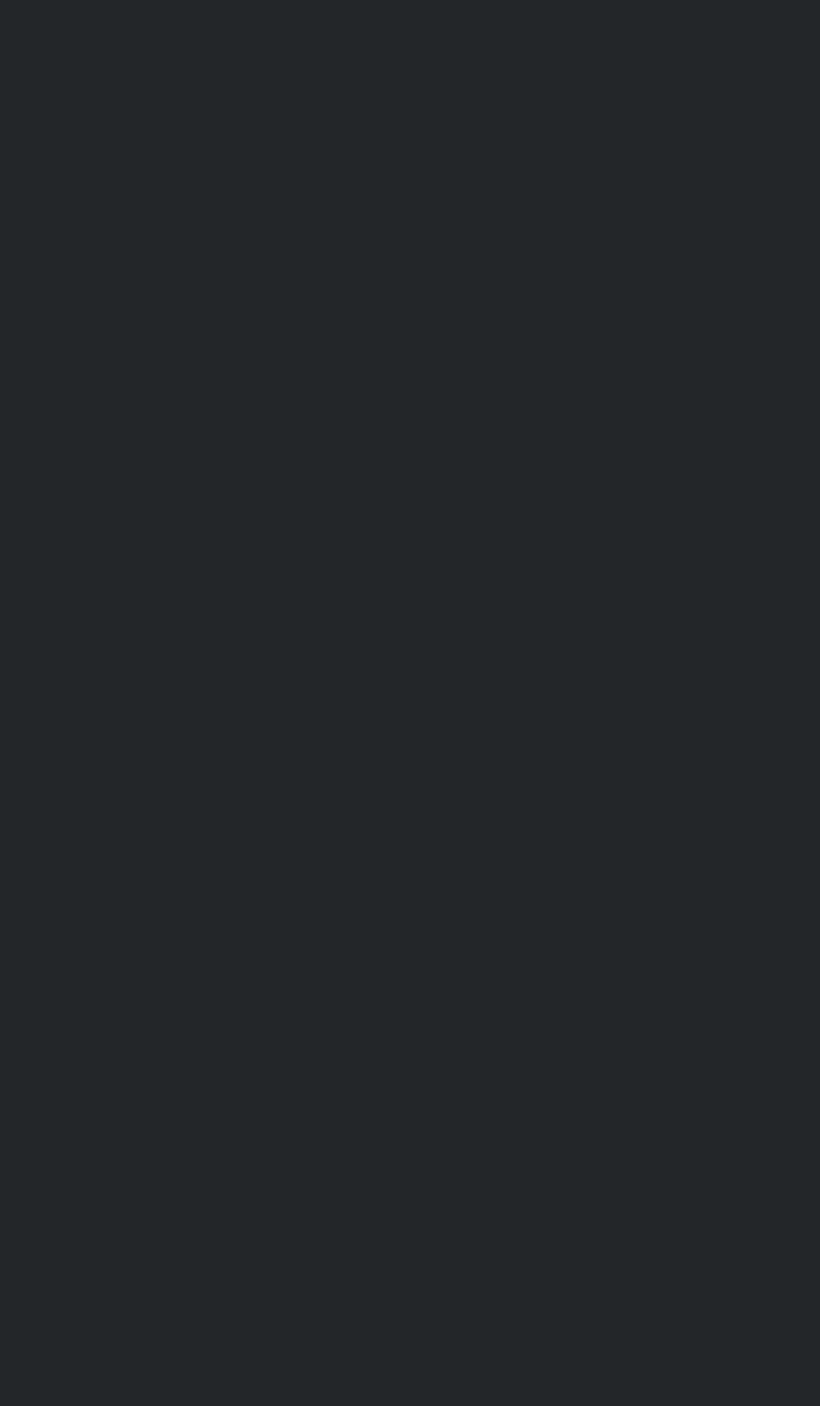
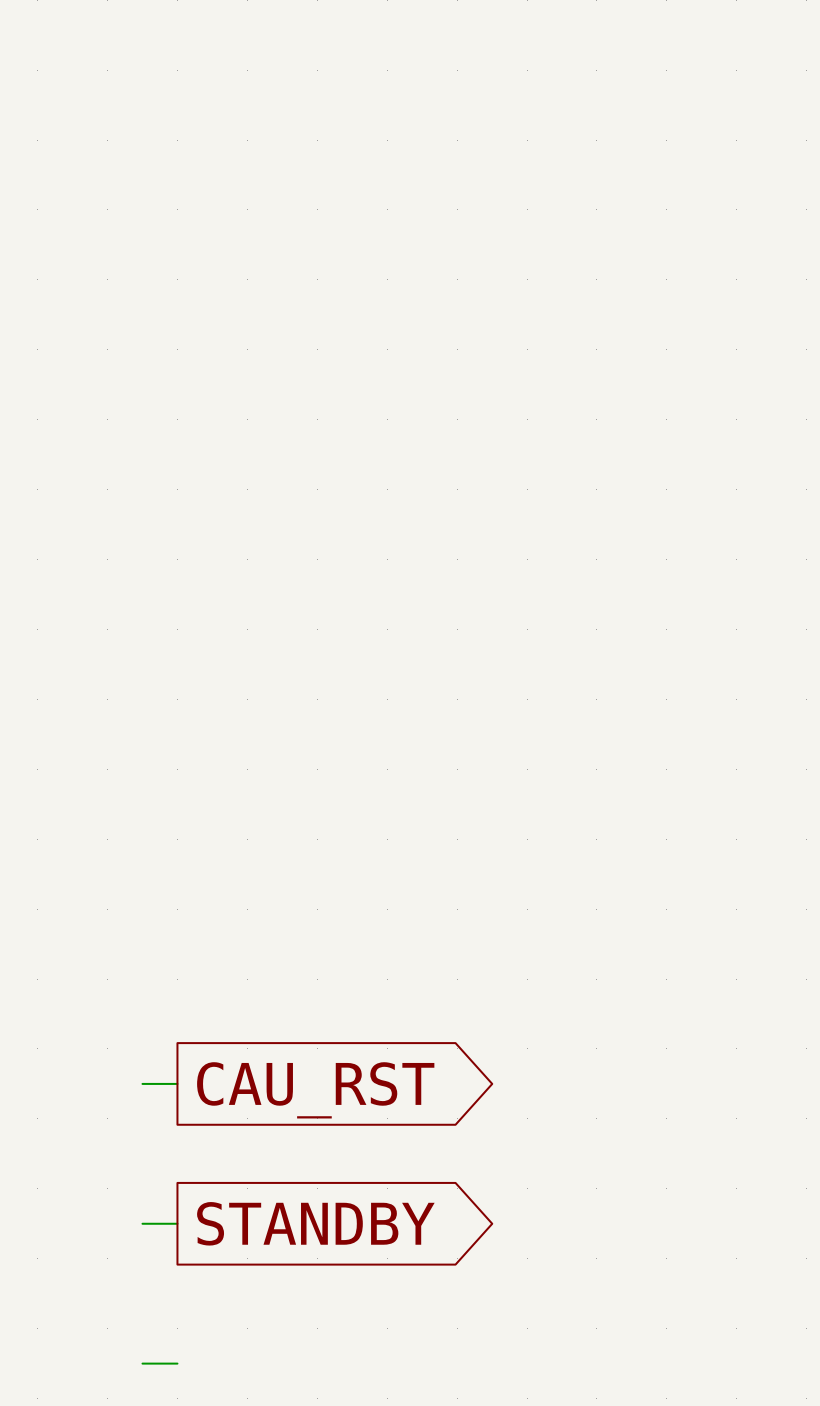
wire: none -> (142, 1083) (177, 1083)
global label: none -> CAU_RST (315, 1090)
wire: none -> (142, 1223) (177, 1223)
global label: none -> STANDBY (315, 1223)
wire: none -> (142, 1363) (177, 1363)

